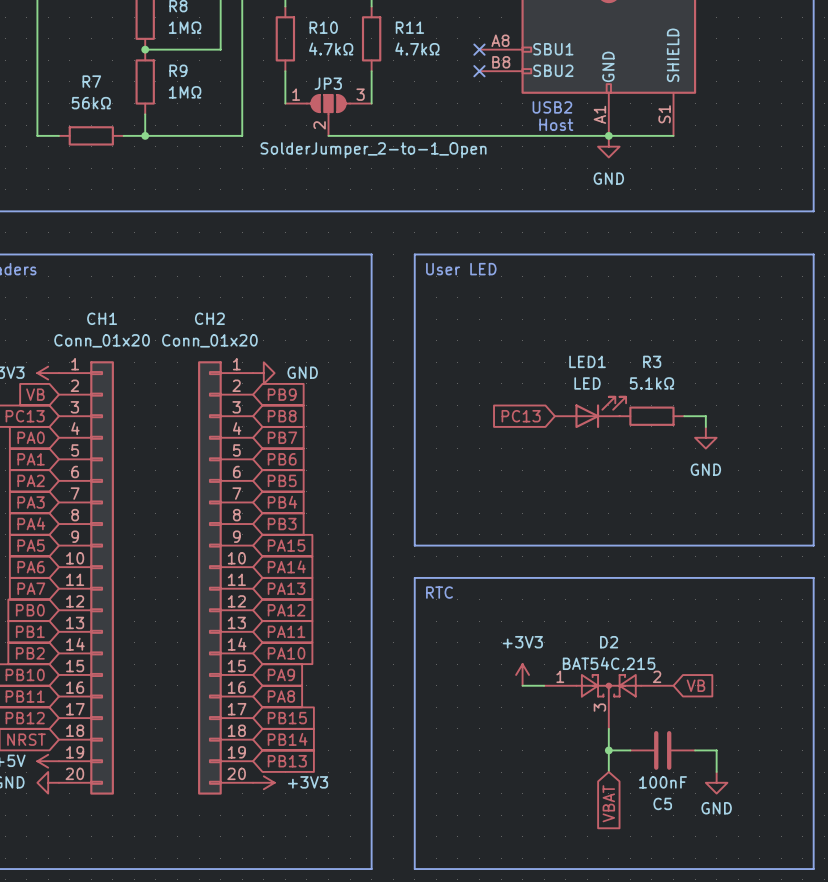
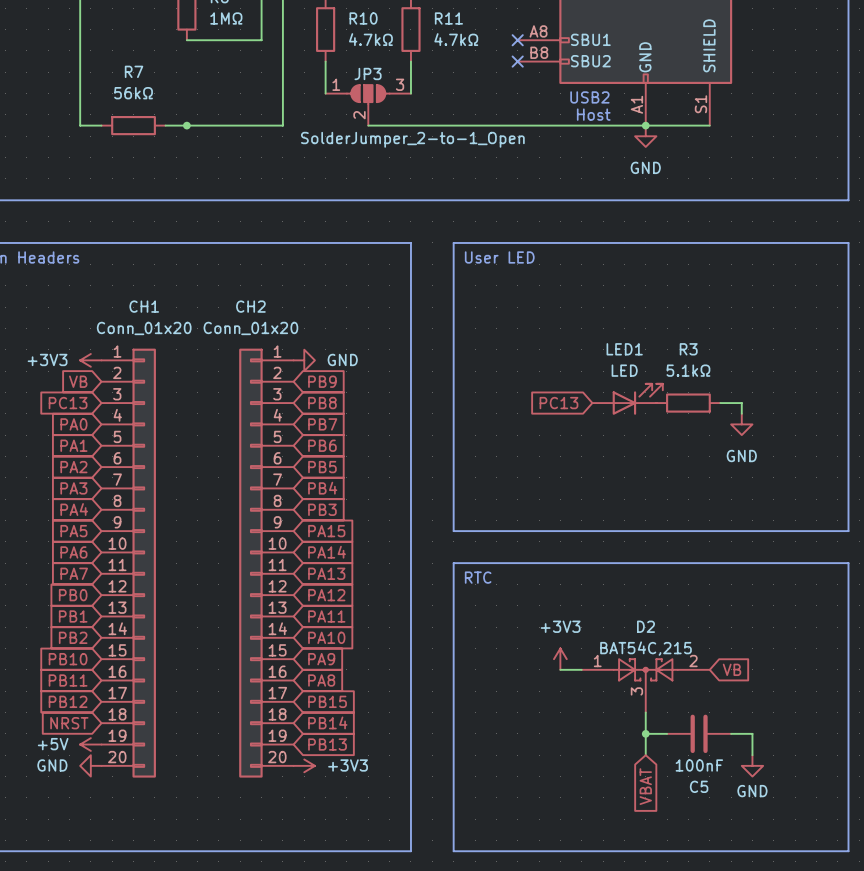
junction: (145, 49) -> none
R9: 1MΩ (145, 81) -> none
wire: (145, 114) (145, 135) -> none

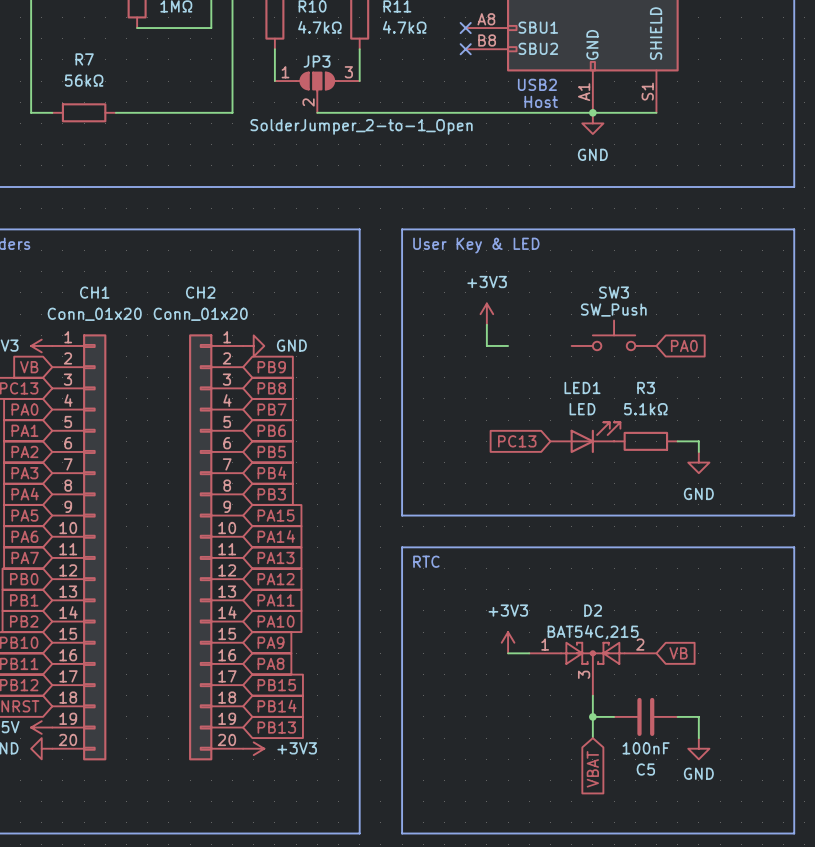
junction: (186, 125) -> none
text: User LED (499, 257) -> User Key & LED (476, 245)
power symbol: none -> +3V3 (486, 314)
wire: none -> (486, 324) (486, 345) (508, 345)
SW3: none -> SW_Push (614, 335)
global label: none -> PA0 (684, 345)
LED1 position: (627, 399) -> (585, 437)
global label position: PC13 (558, 403) -> PC13 (517, 441)
R3 position: (688, 403) -> (645, 441)
wire: (720, 403) (741, 403) (741, 413) -> (677, 441) (698, 441) (698, 451)
power symbol position: GND (741, 424) -> GND (698, 462)

